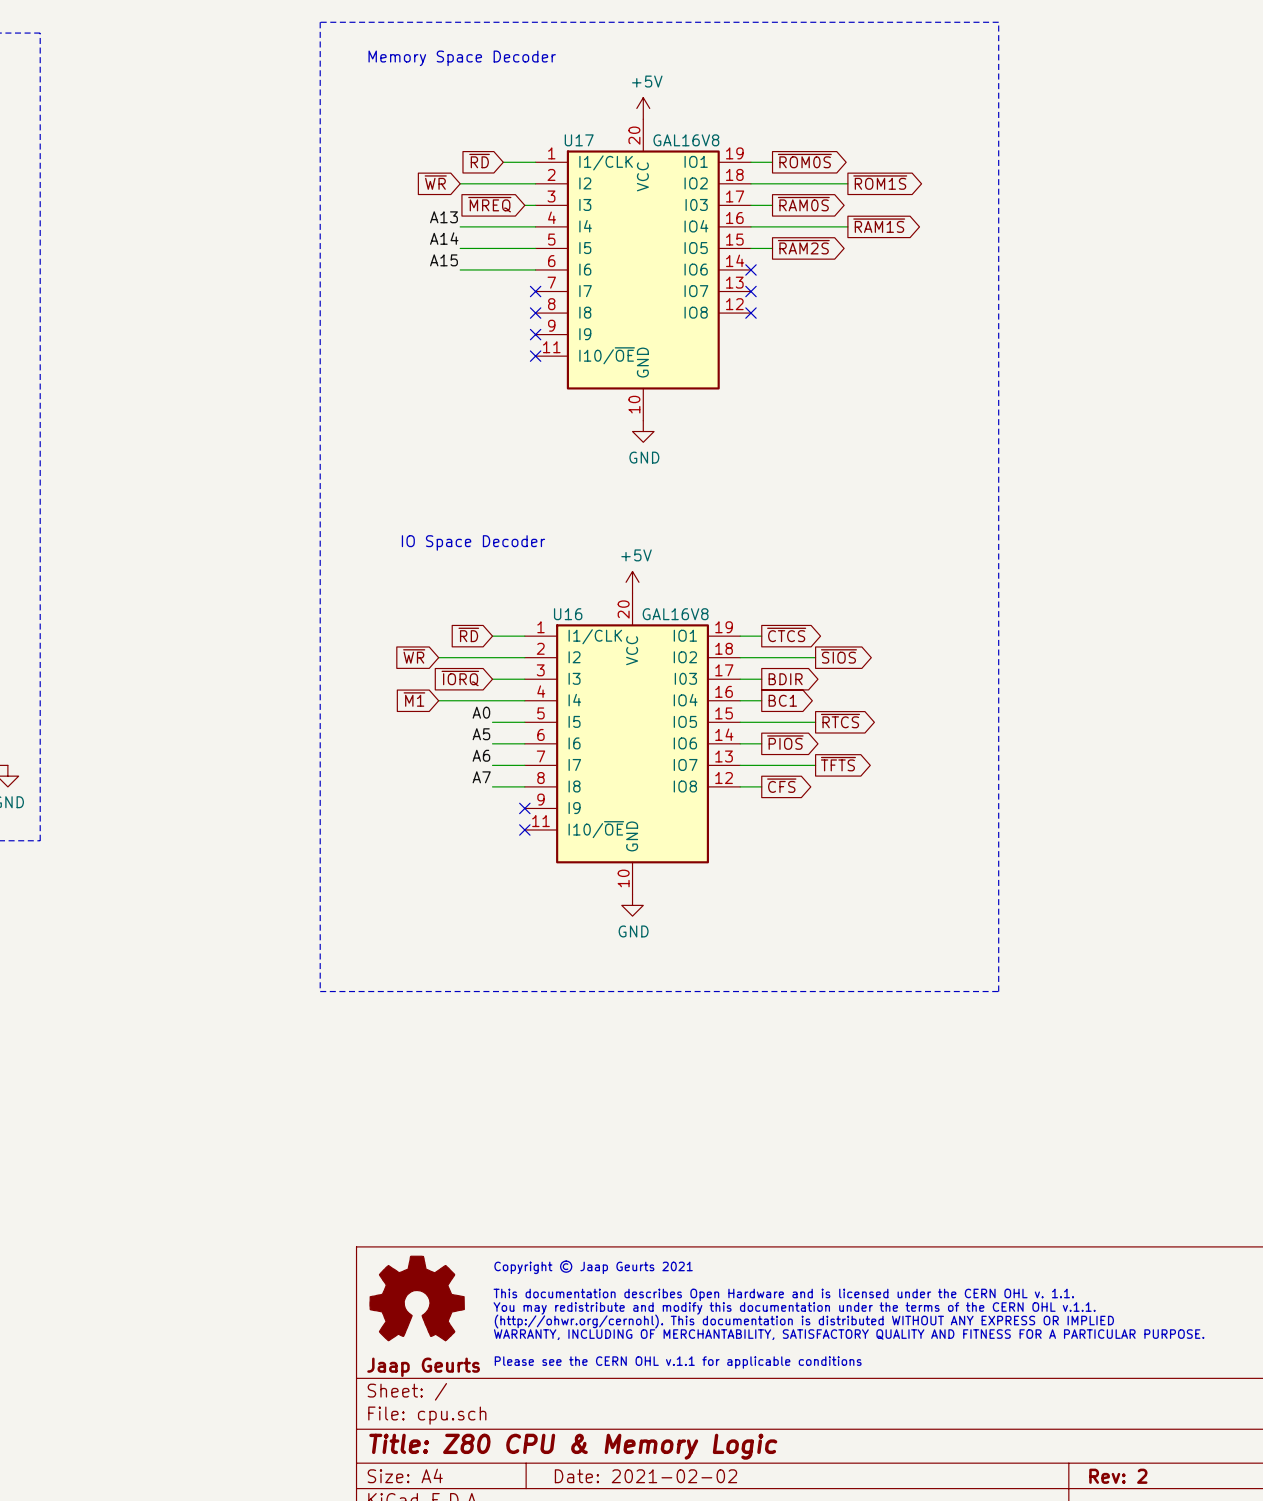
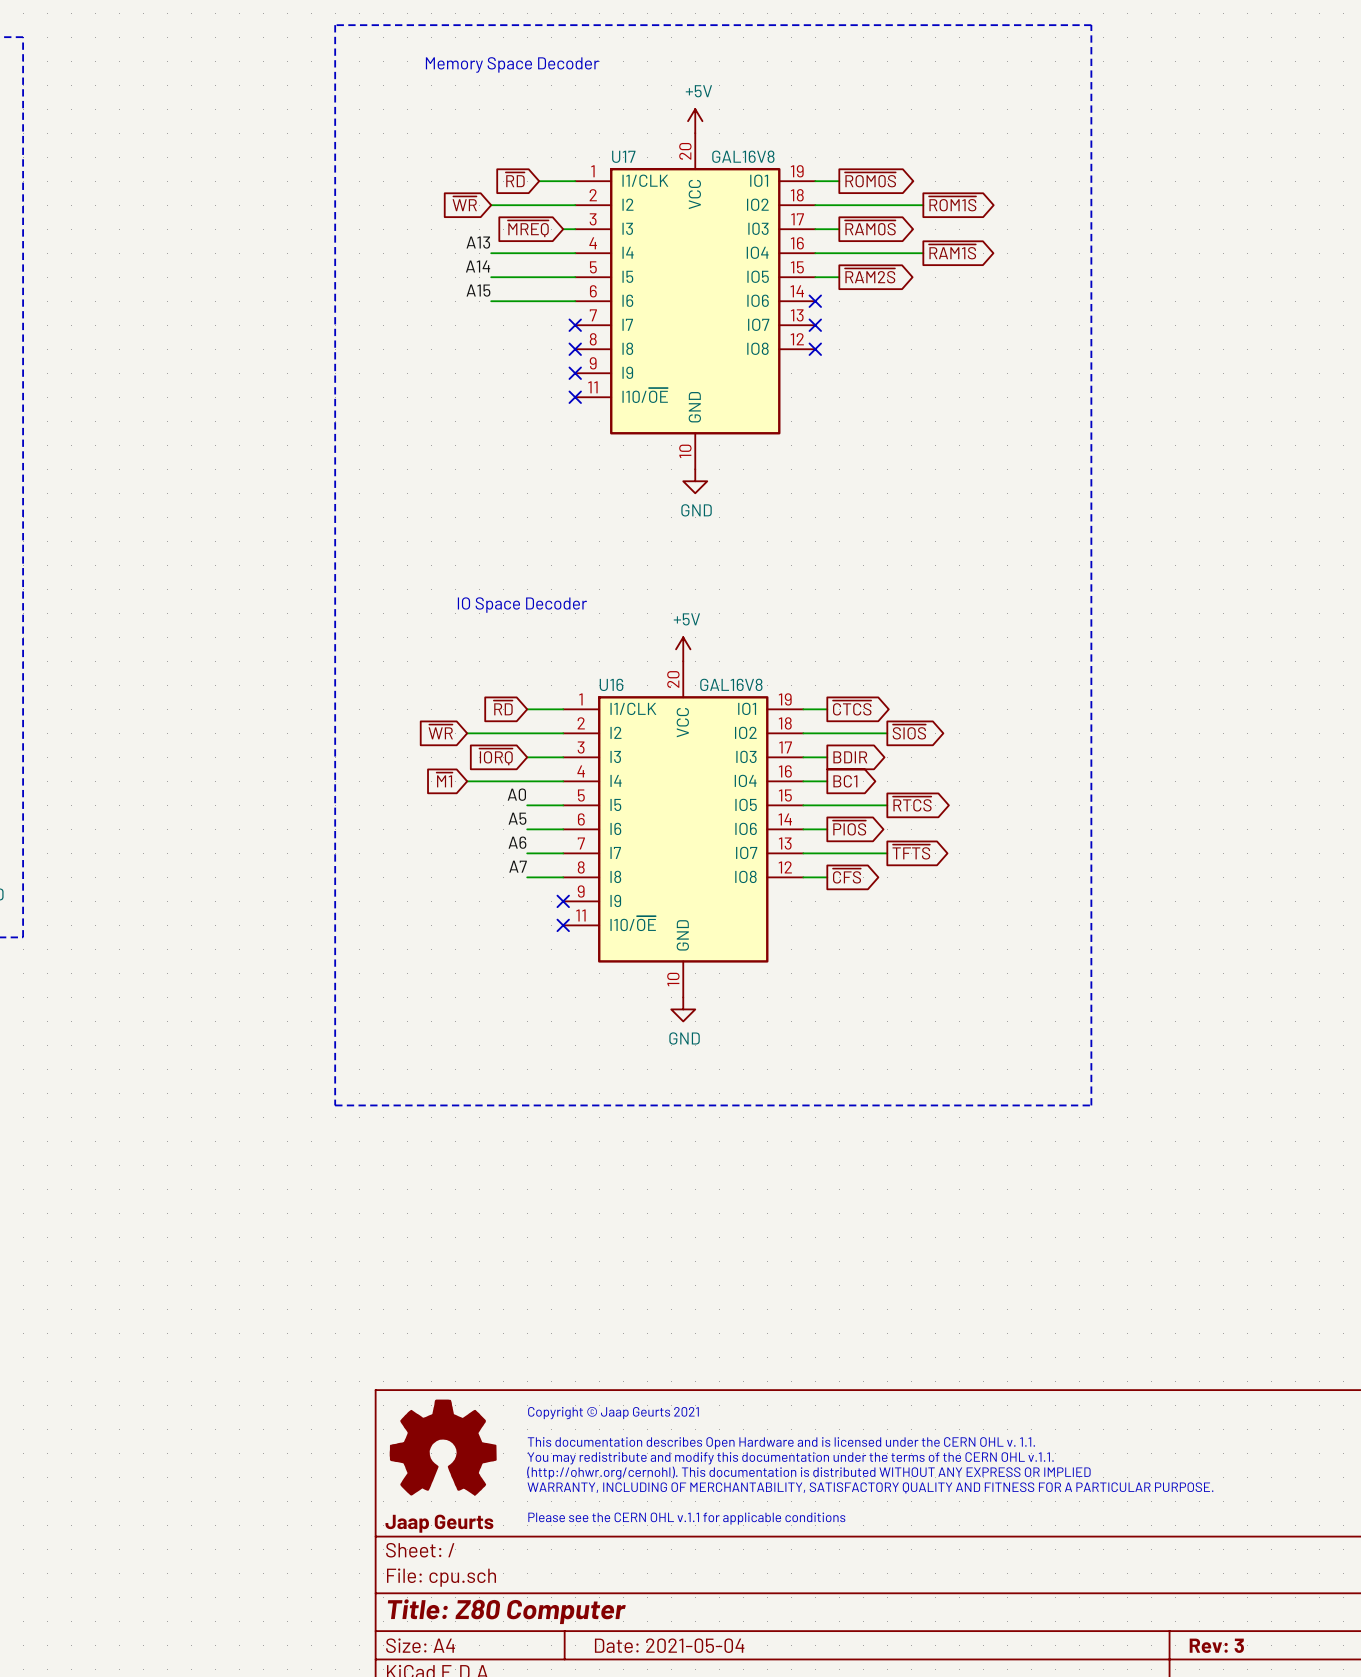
title block: Title: Z80 CPU & Memory Logic (573, 1446) -> Title: Z80 Computer (506, 1611)
title block: Date: 2021-02-02 (645, 1476) -> Date: 2021-05-04 (669, 1645)
title block: Rev: 2 (1118, 1476) -> Rev: 3 (1216, 1645)

